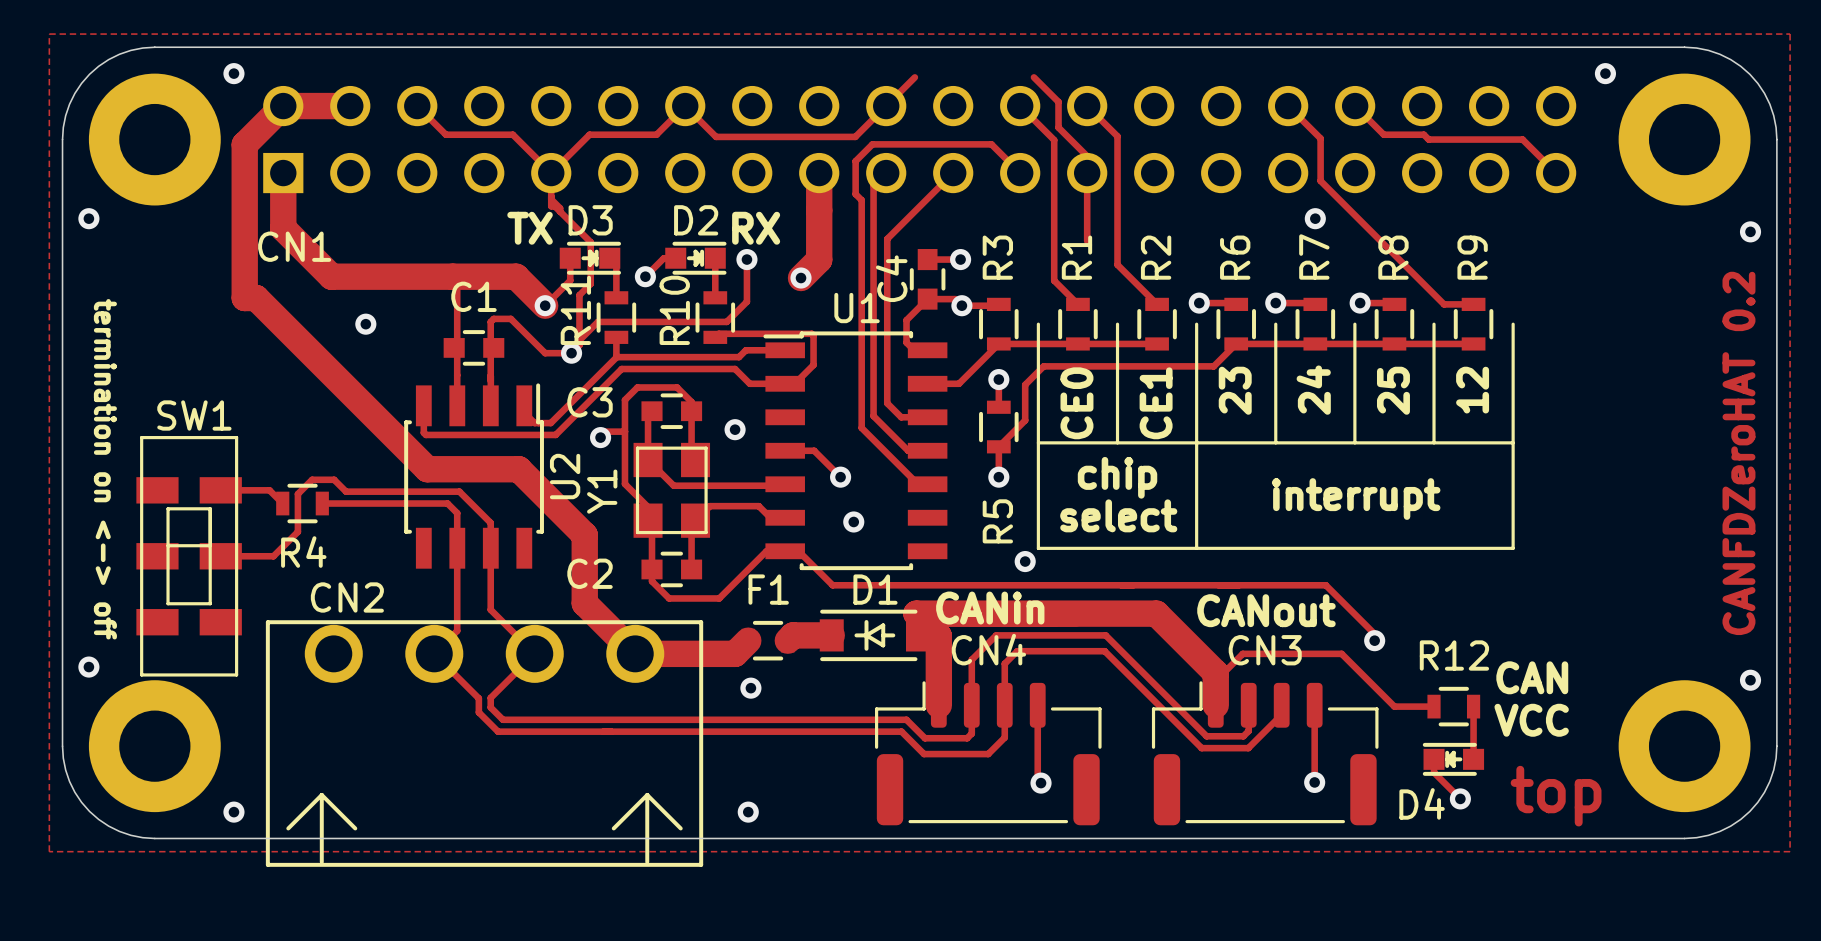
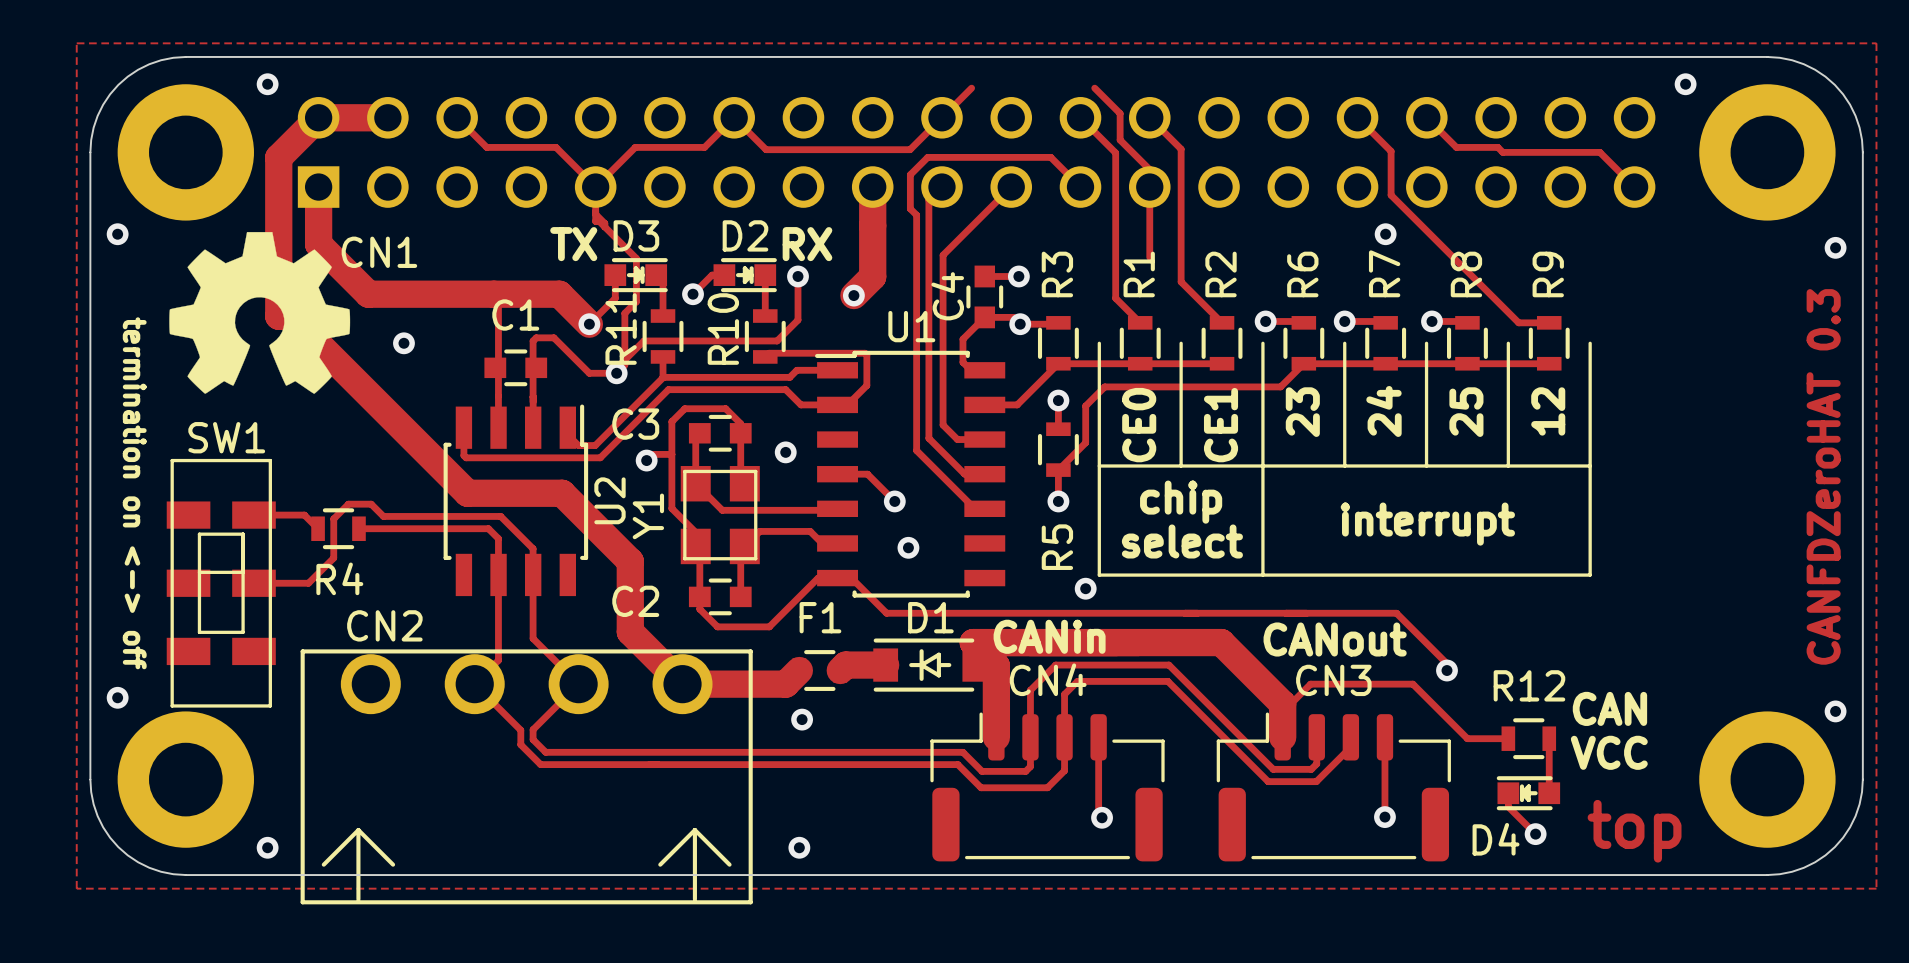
drawing: none -> [169, 232, 351, 394]
CN1 name position: CN1 (294, 246) -> CN1 (379, 252)
text: CANFDZeroHAT 0.2 (1738, 453) -> CANFDZeroHAT 0.3 (1823, 476)

